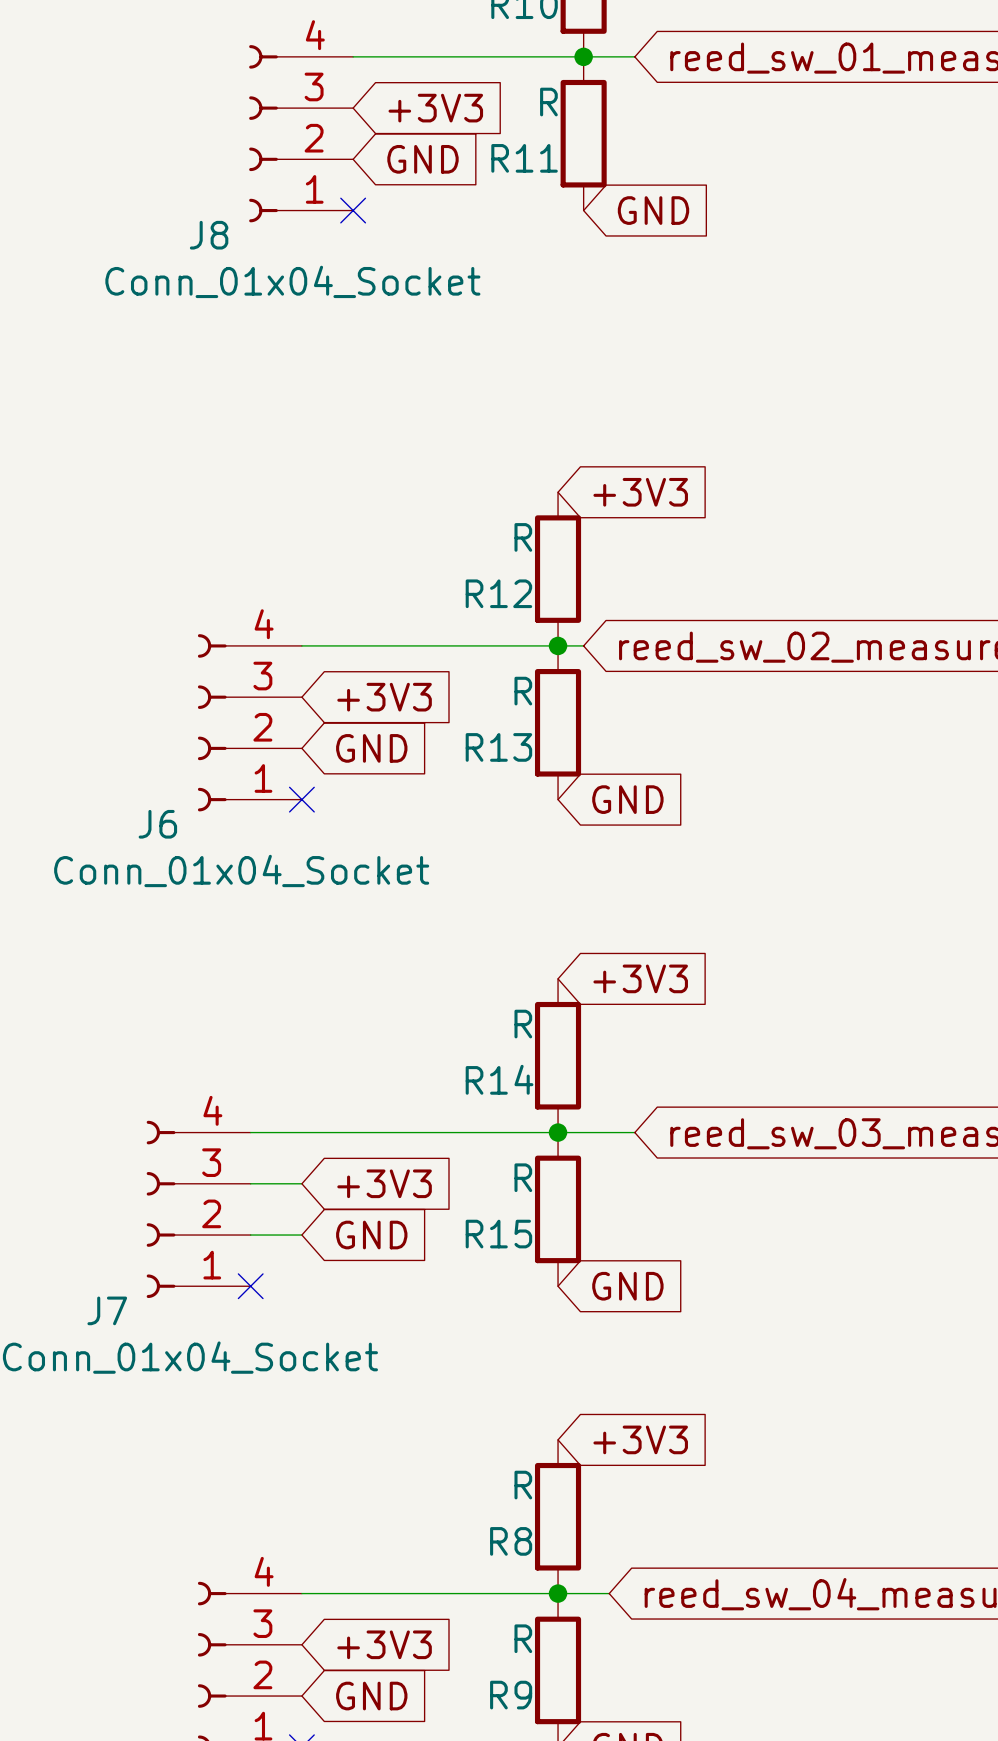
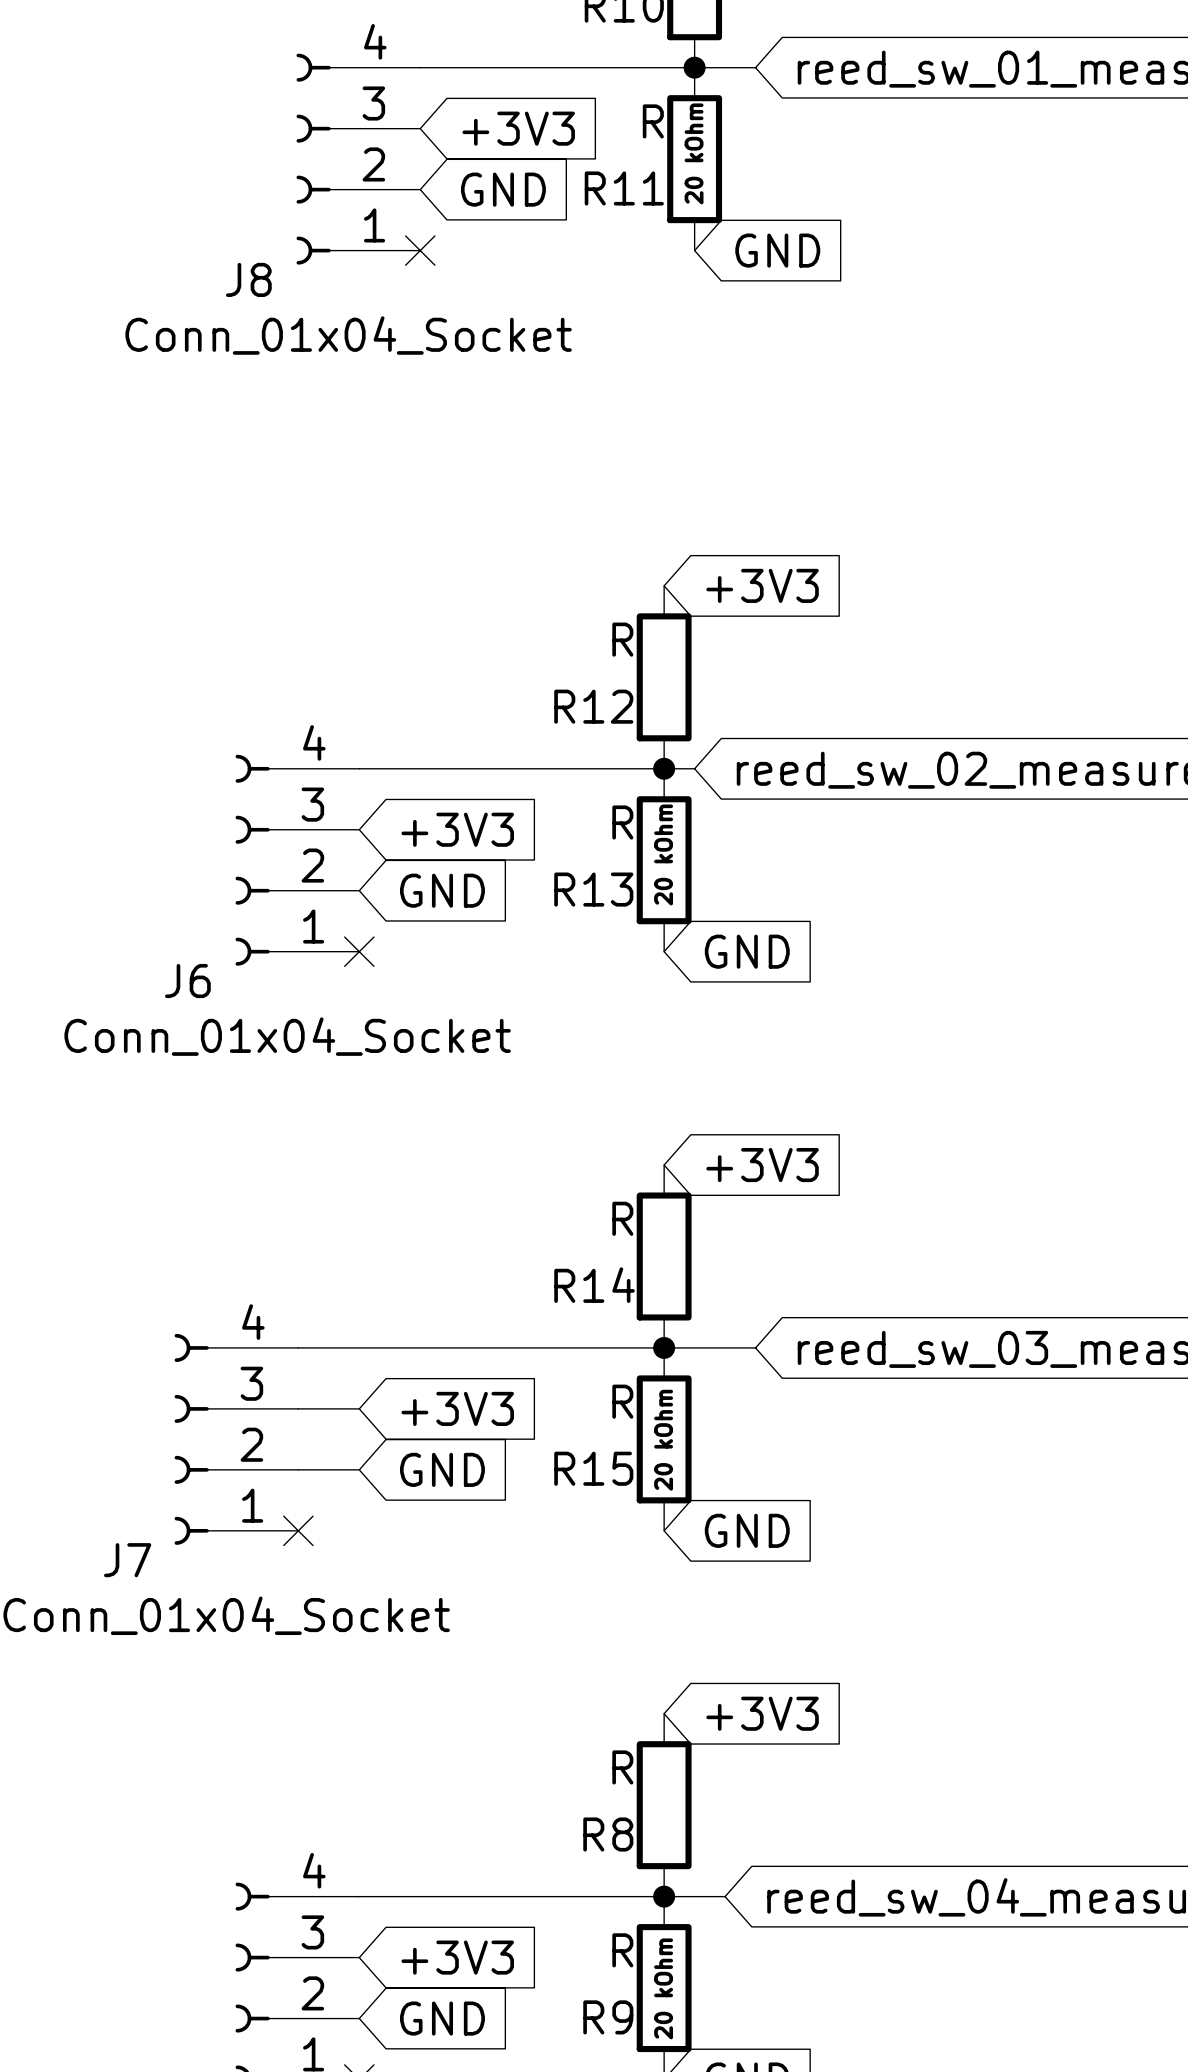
text: none -> 20 kOhm (694, 153)
text: none -> 20 kOhm (663, 854)
text: none -> 20 kOhm (663, 1440)
text: none -> 20 kOhm (663, 1988)

